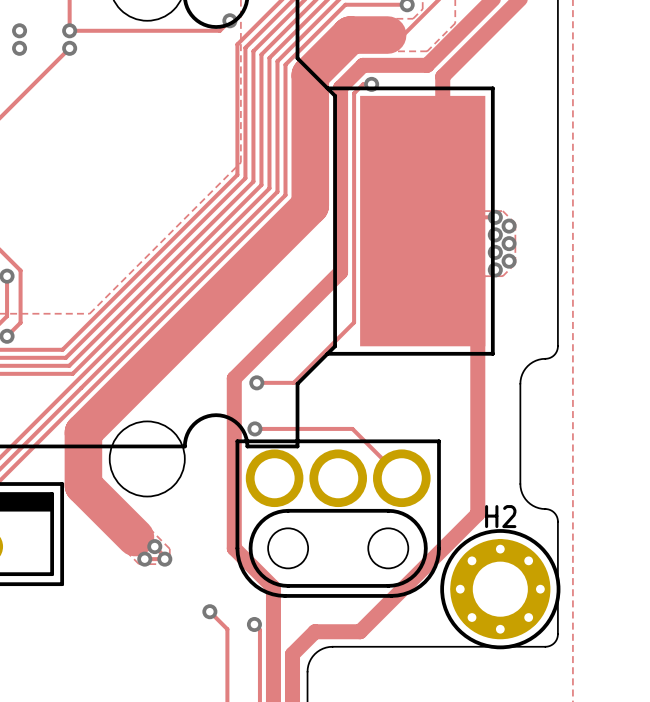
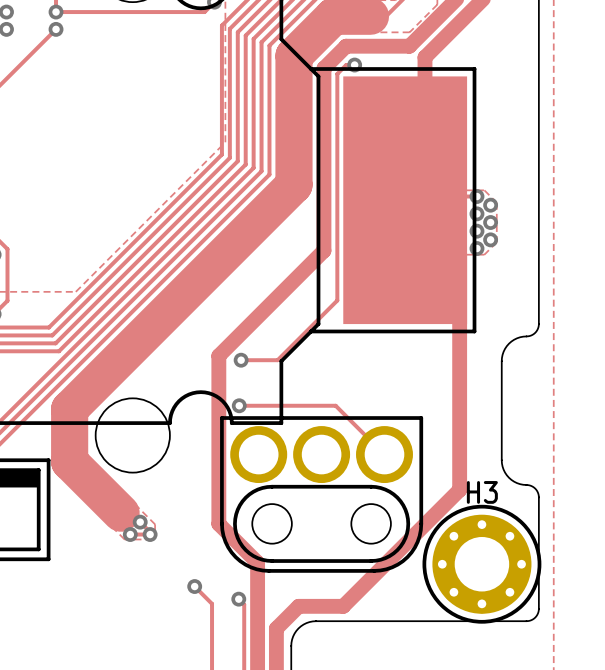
H2 name: H2 (500, 516) -> H3 (482, 492)

